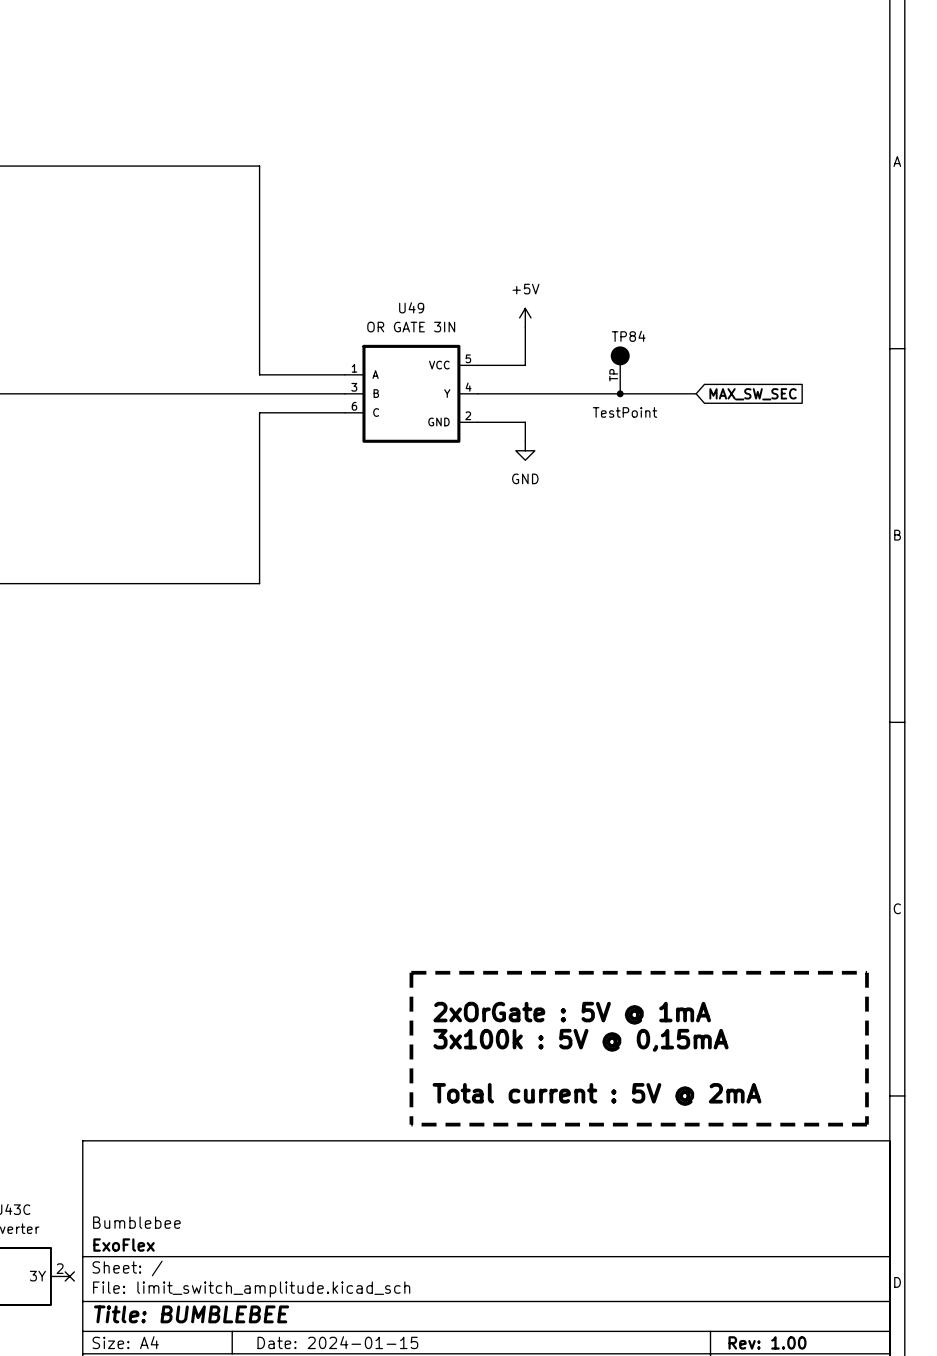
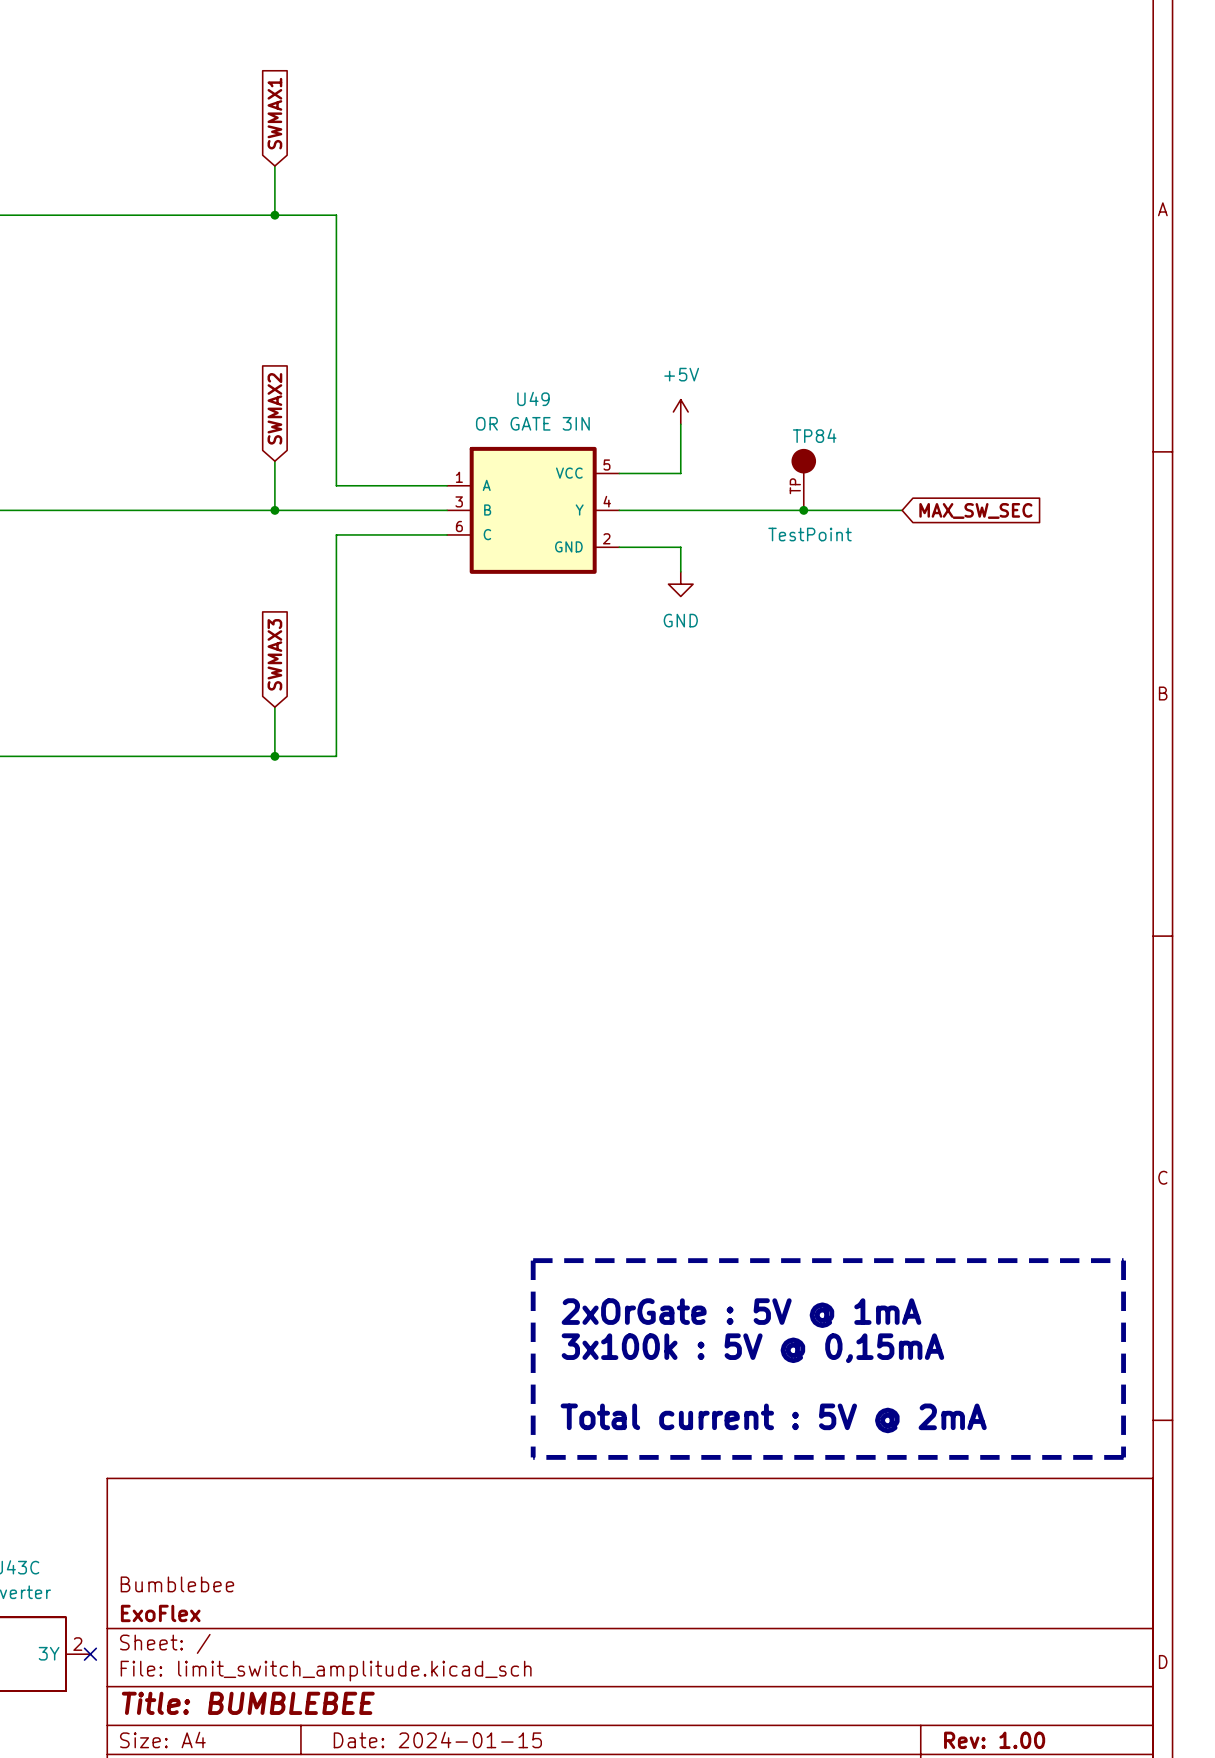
global label: none -> SWMAX1 (274, 113)
wire: none -> (274, 166) (274, 215)
junction: none -> (274, 215)
global label: none -> SWMAX2 (274, 408)
wire: none -> (274, 461) (274, 510)
junction: none -> (274, 510)
global label: none -> SWMAX3 (274, 654)
wire: none -> (274, 707) (274, 756)
junction: none -> (274, 756)

